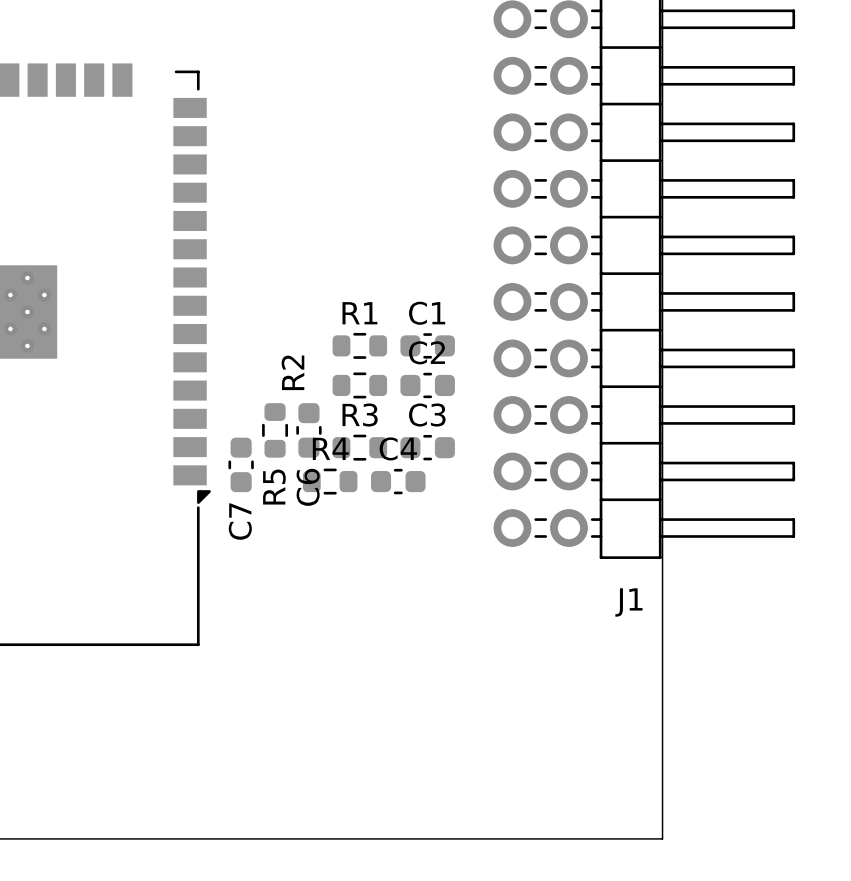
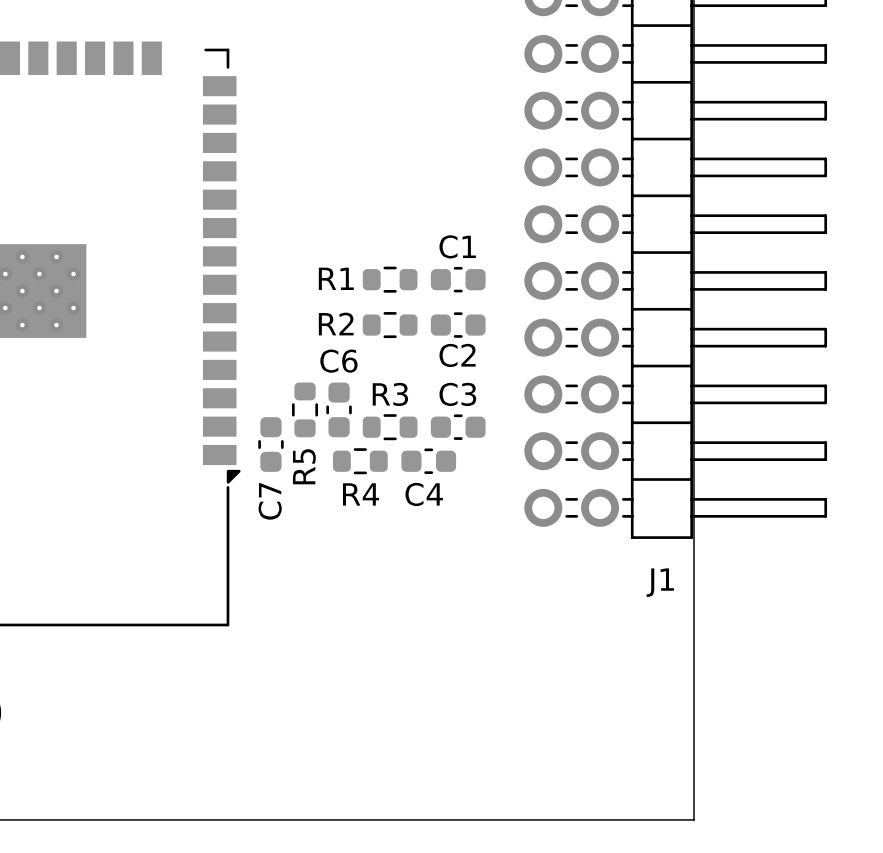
R1: none -> (390, 279)
C1: none -> (458, 279)
R1 name: R1 (359, 313) -> R2 (336, 324)
C1 name: C1 (427, 313) -> C2 (457, 355)
R2: (359, 385) -> none
C2: (427, 385) -> none
R4 name position: R4 (330, 448) -> R4 (360, 494)
C4 name position: C4 (398, 448) -> C4 (424, 494)
C6 name rotation: 0° (308, 487) -> 90° clockwise (338, 361)
C6 name position: C6 (308, 487) -> C6 (338, 361)

